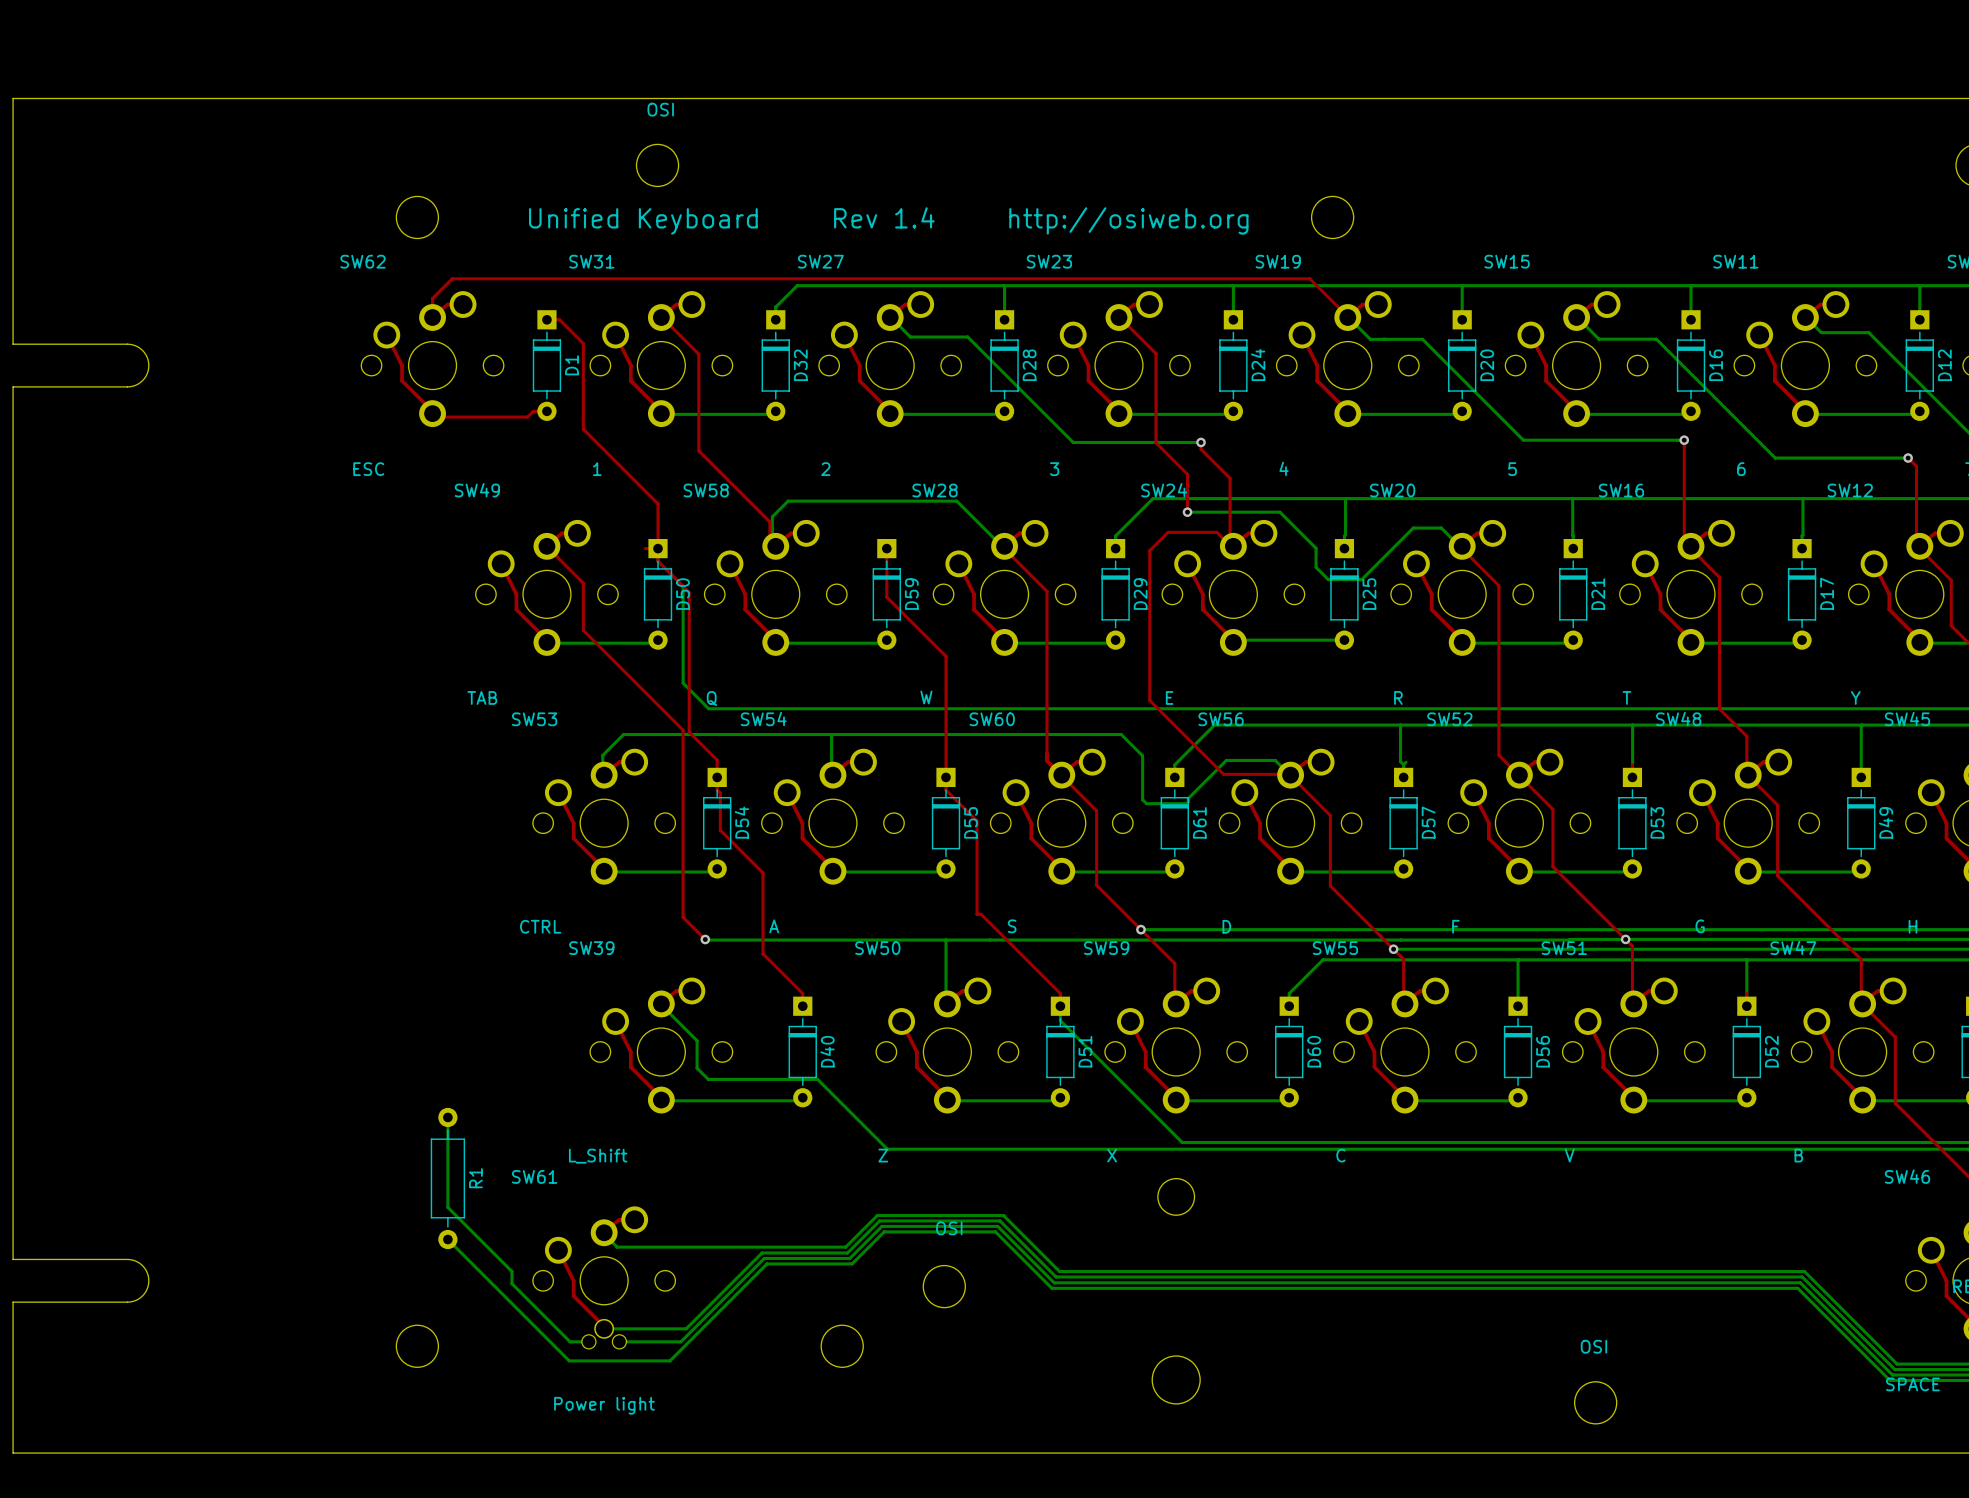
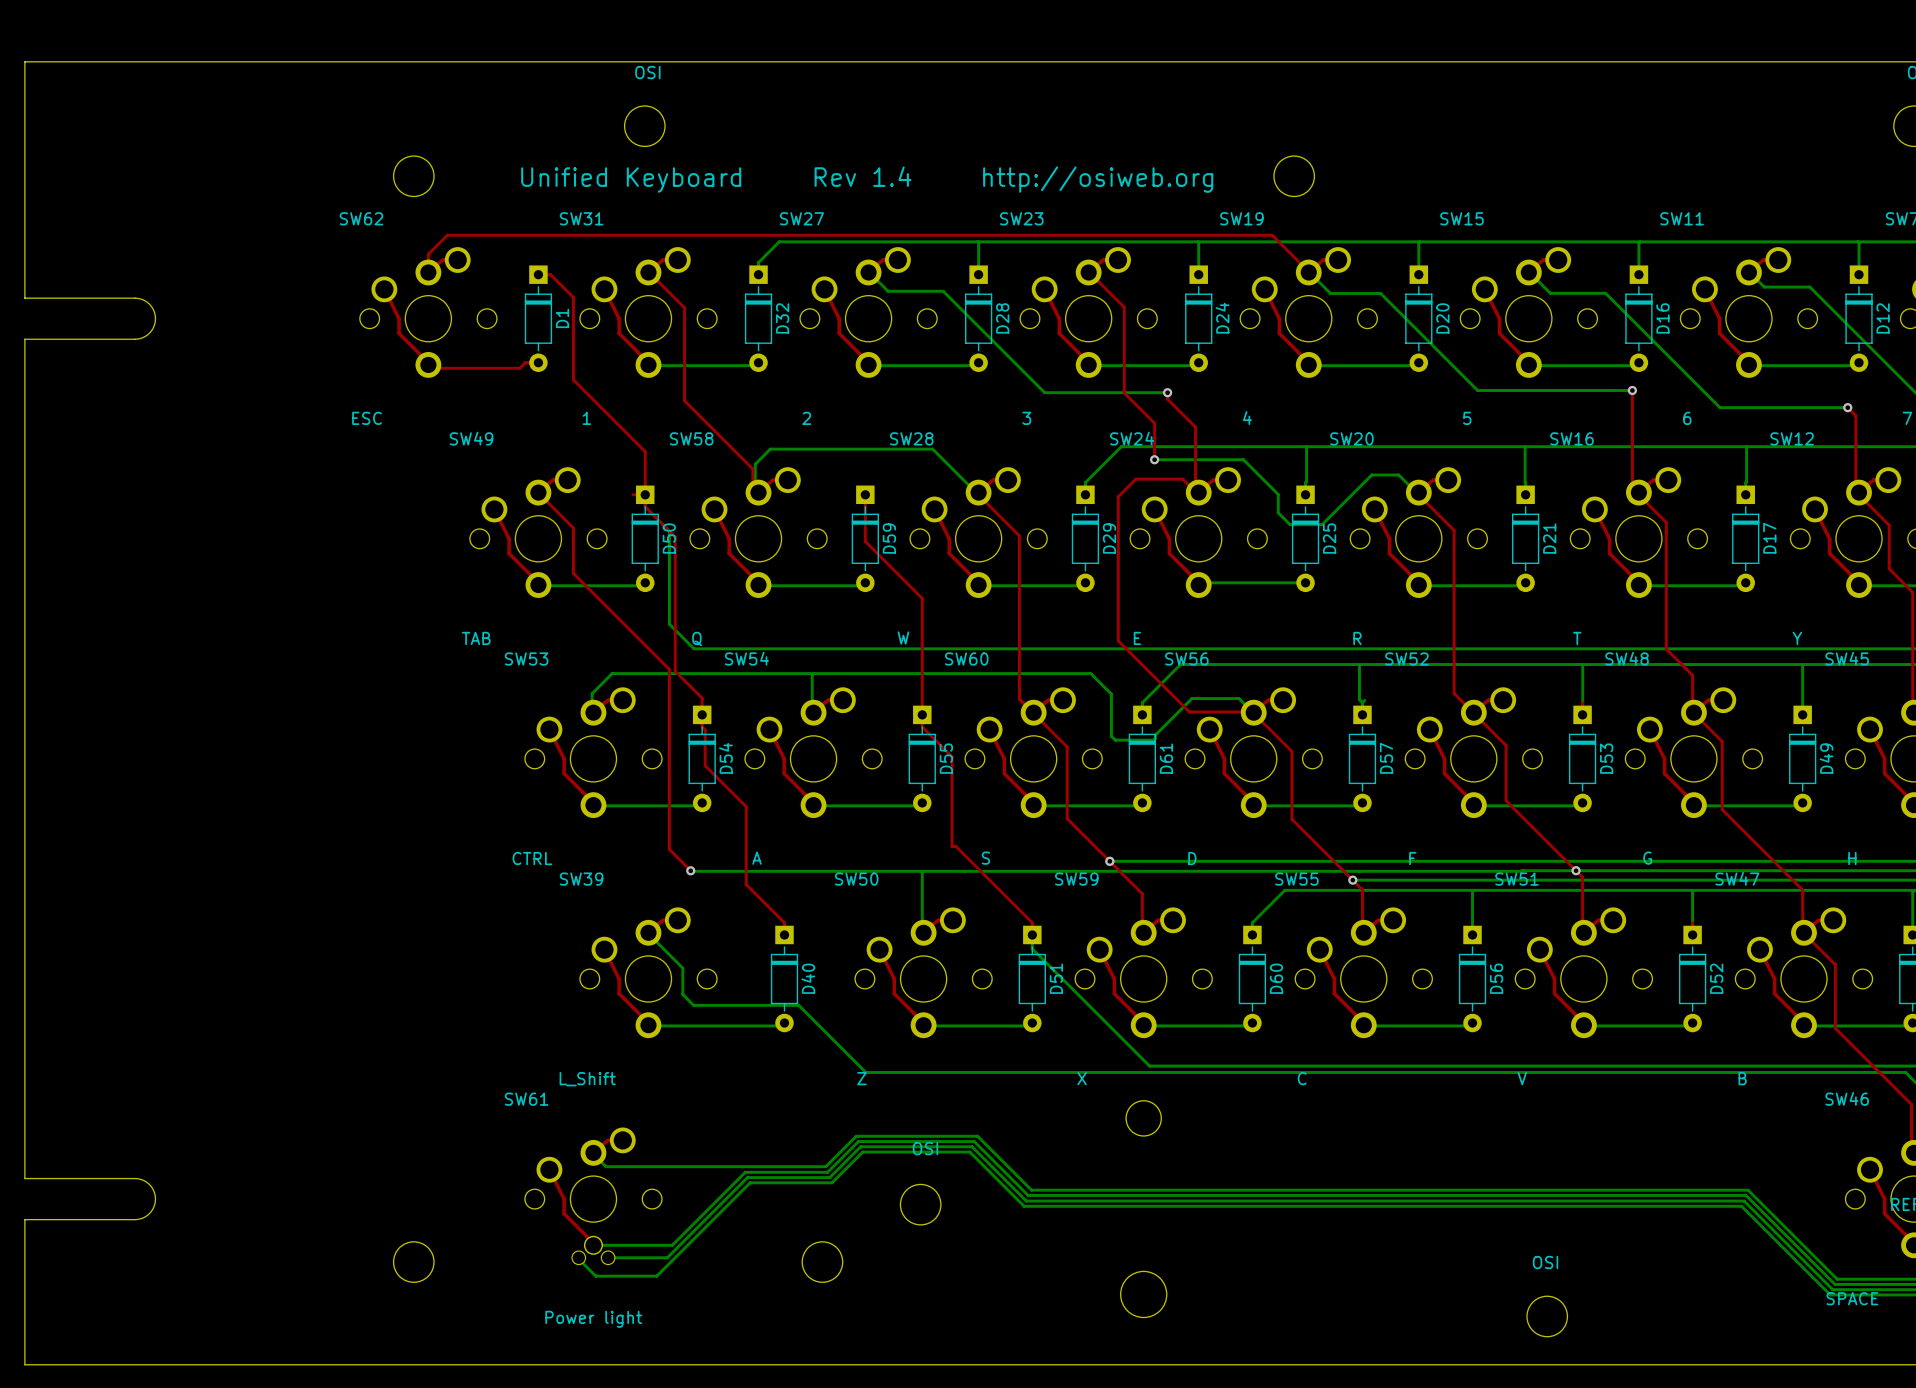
bottom track: (447, 1117) (447, 1207) (511, 1271) (511, 1283) (570, 1341) (588, 1341) -> none
R1: (447, 1178) -> none
bottom track: (447, 1239) (569, 1360) (606, 1360) -> (577, 1257) (595, 1276)

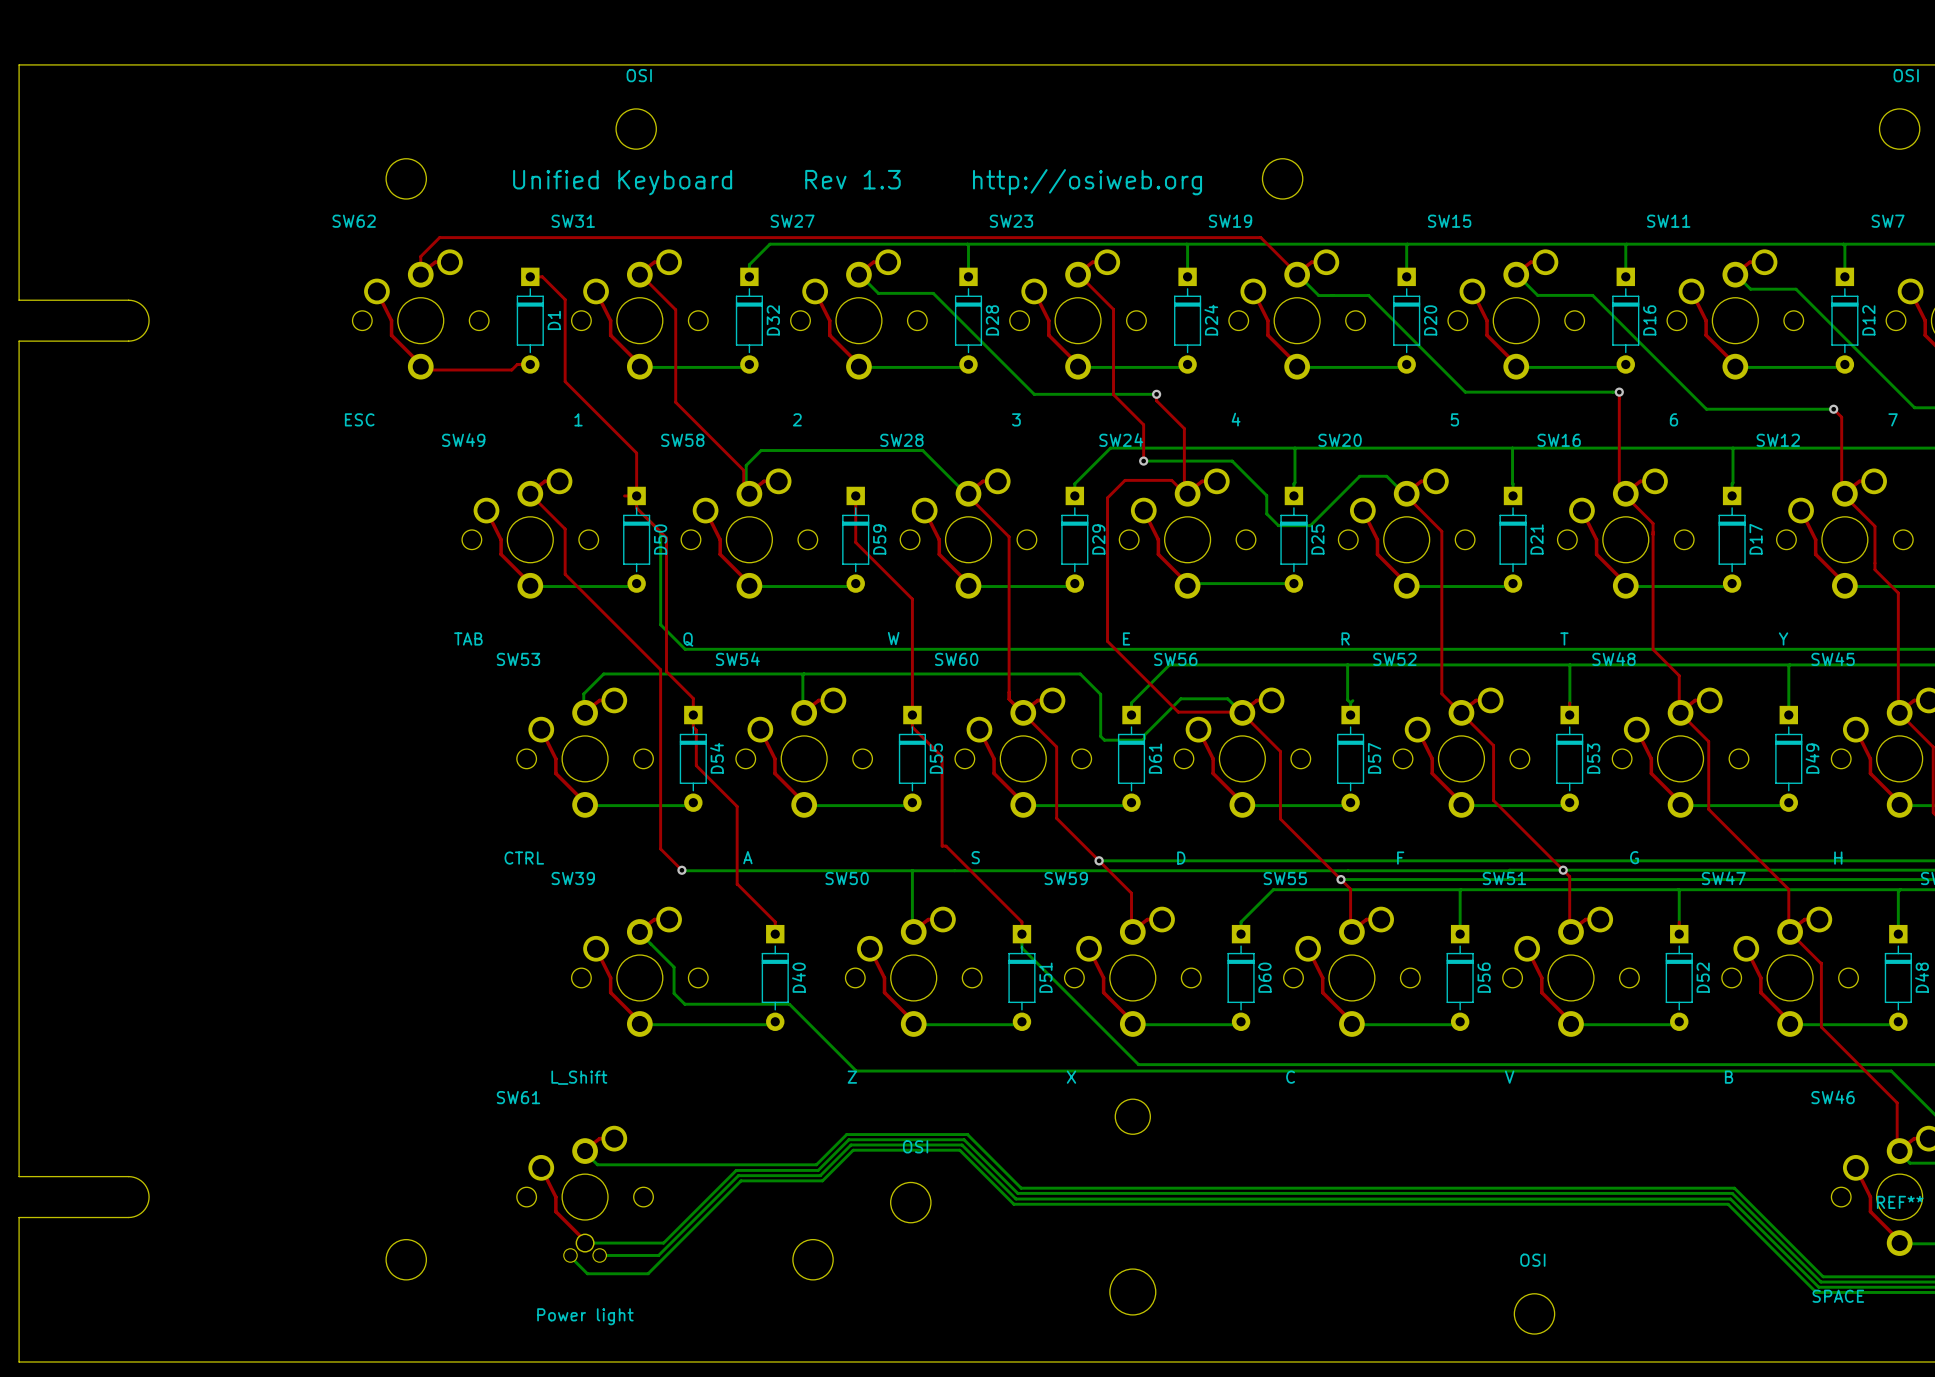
text: Unified Keyboard Rev 1.4 http://osiweb.org (867, 179) -> Unified Keyboard Rev 1.3 http://osiweb.org (857, 182)

